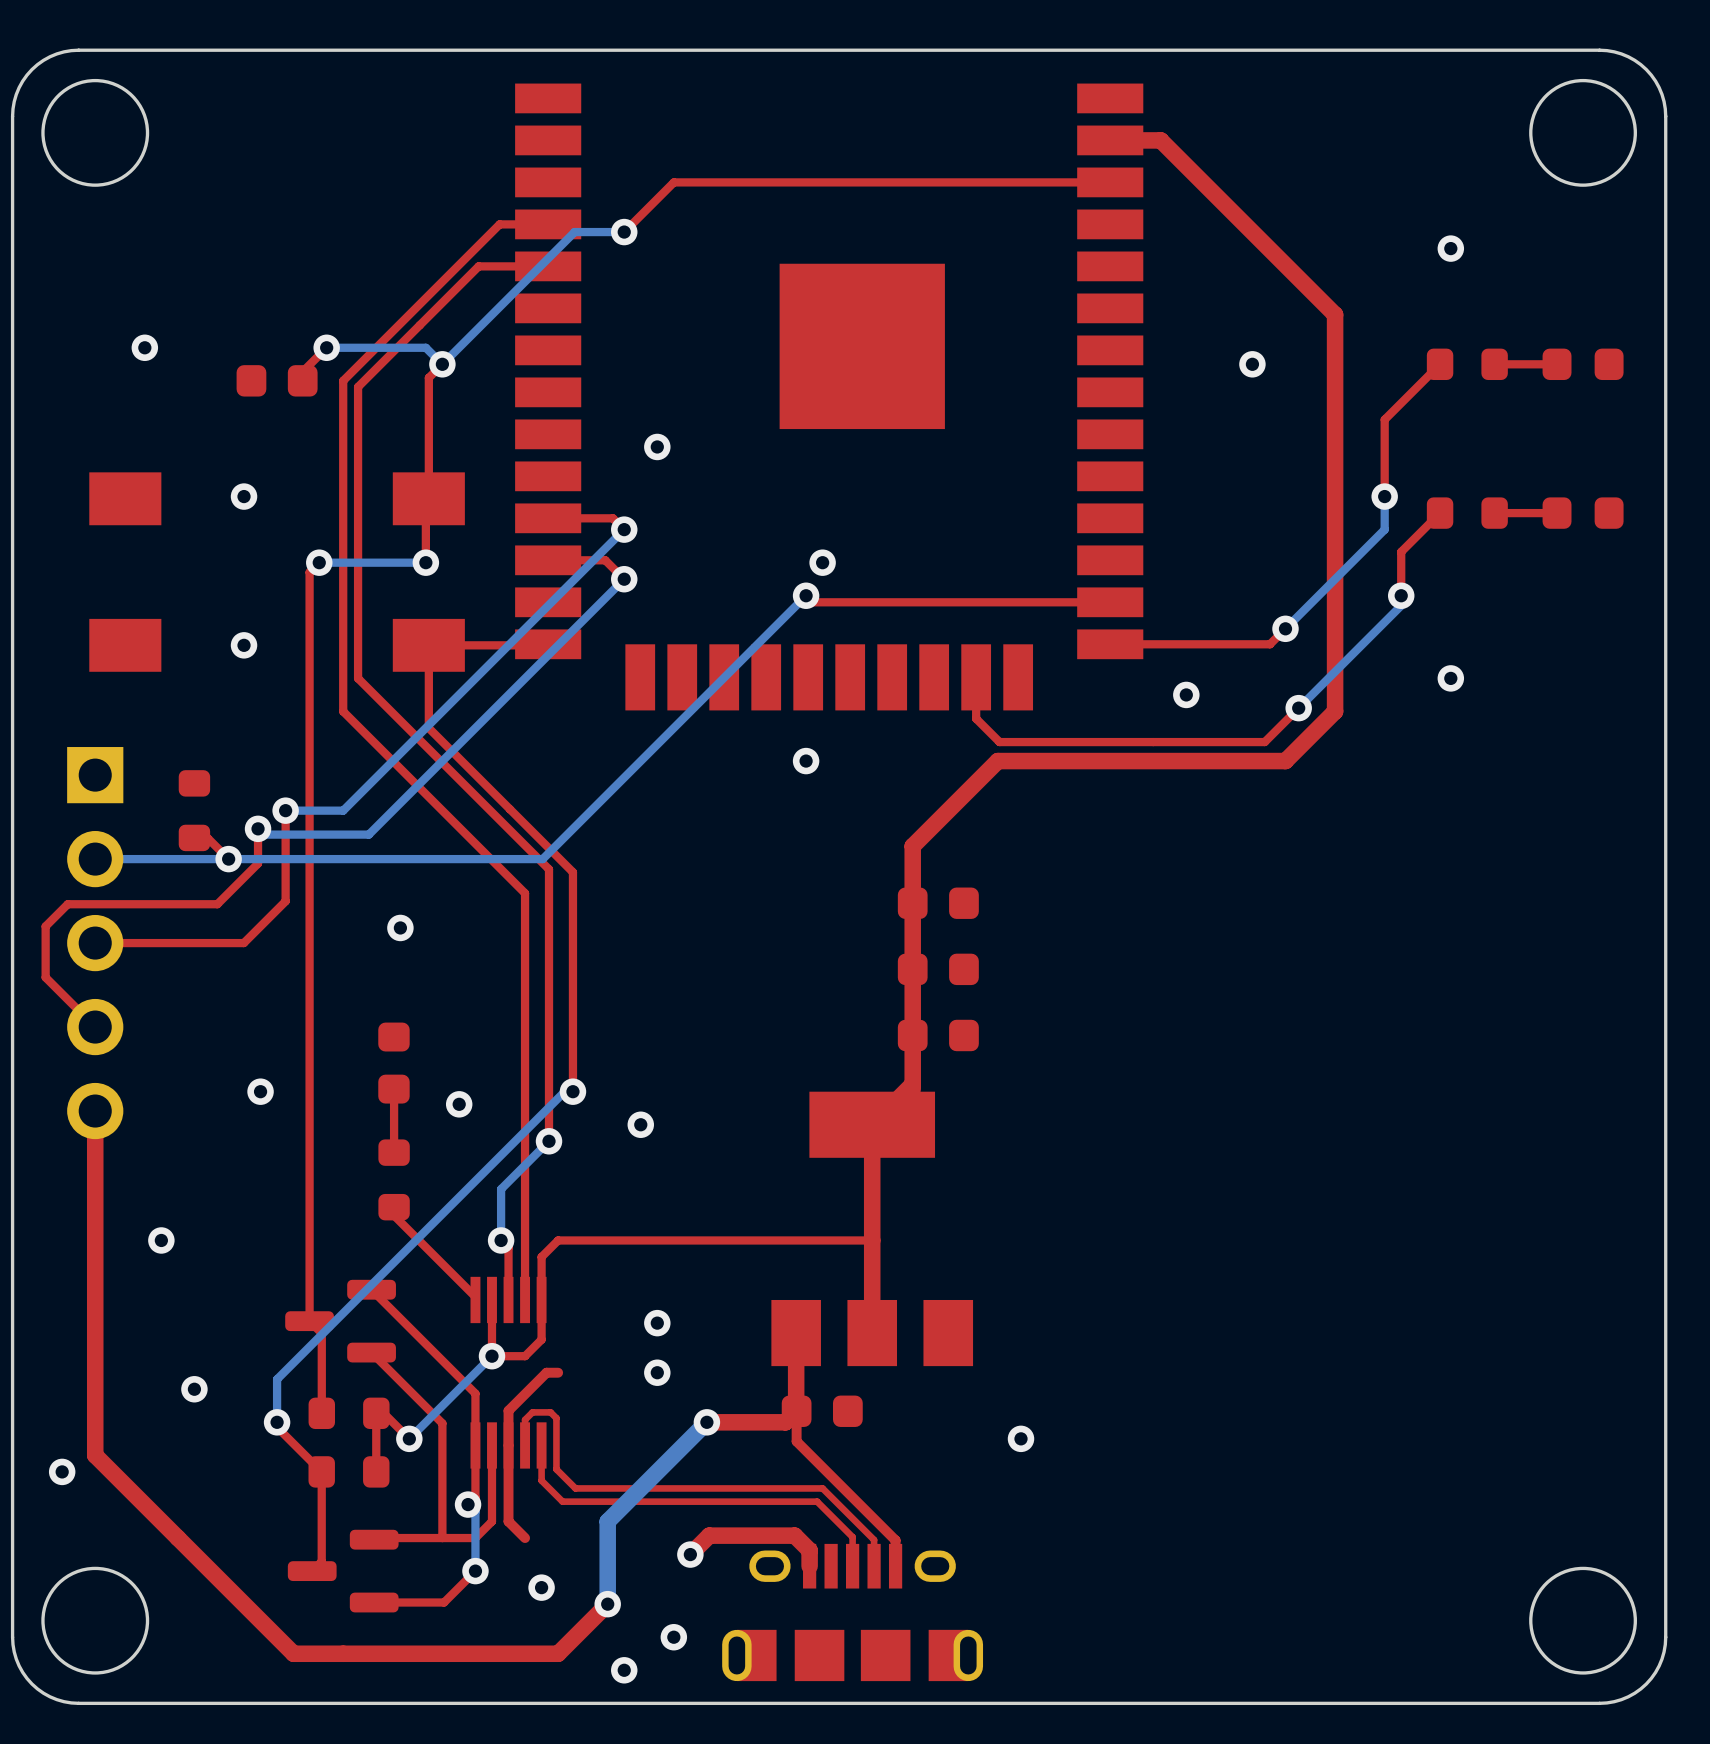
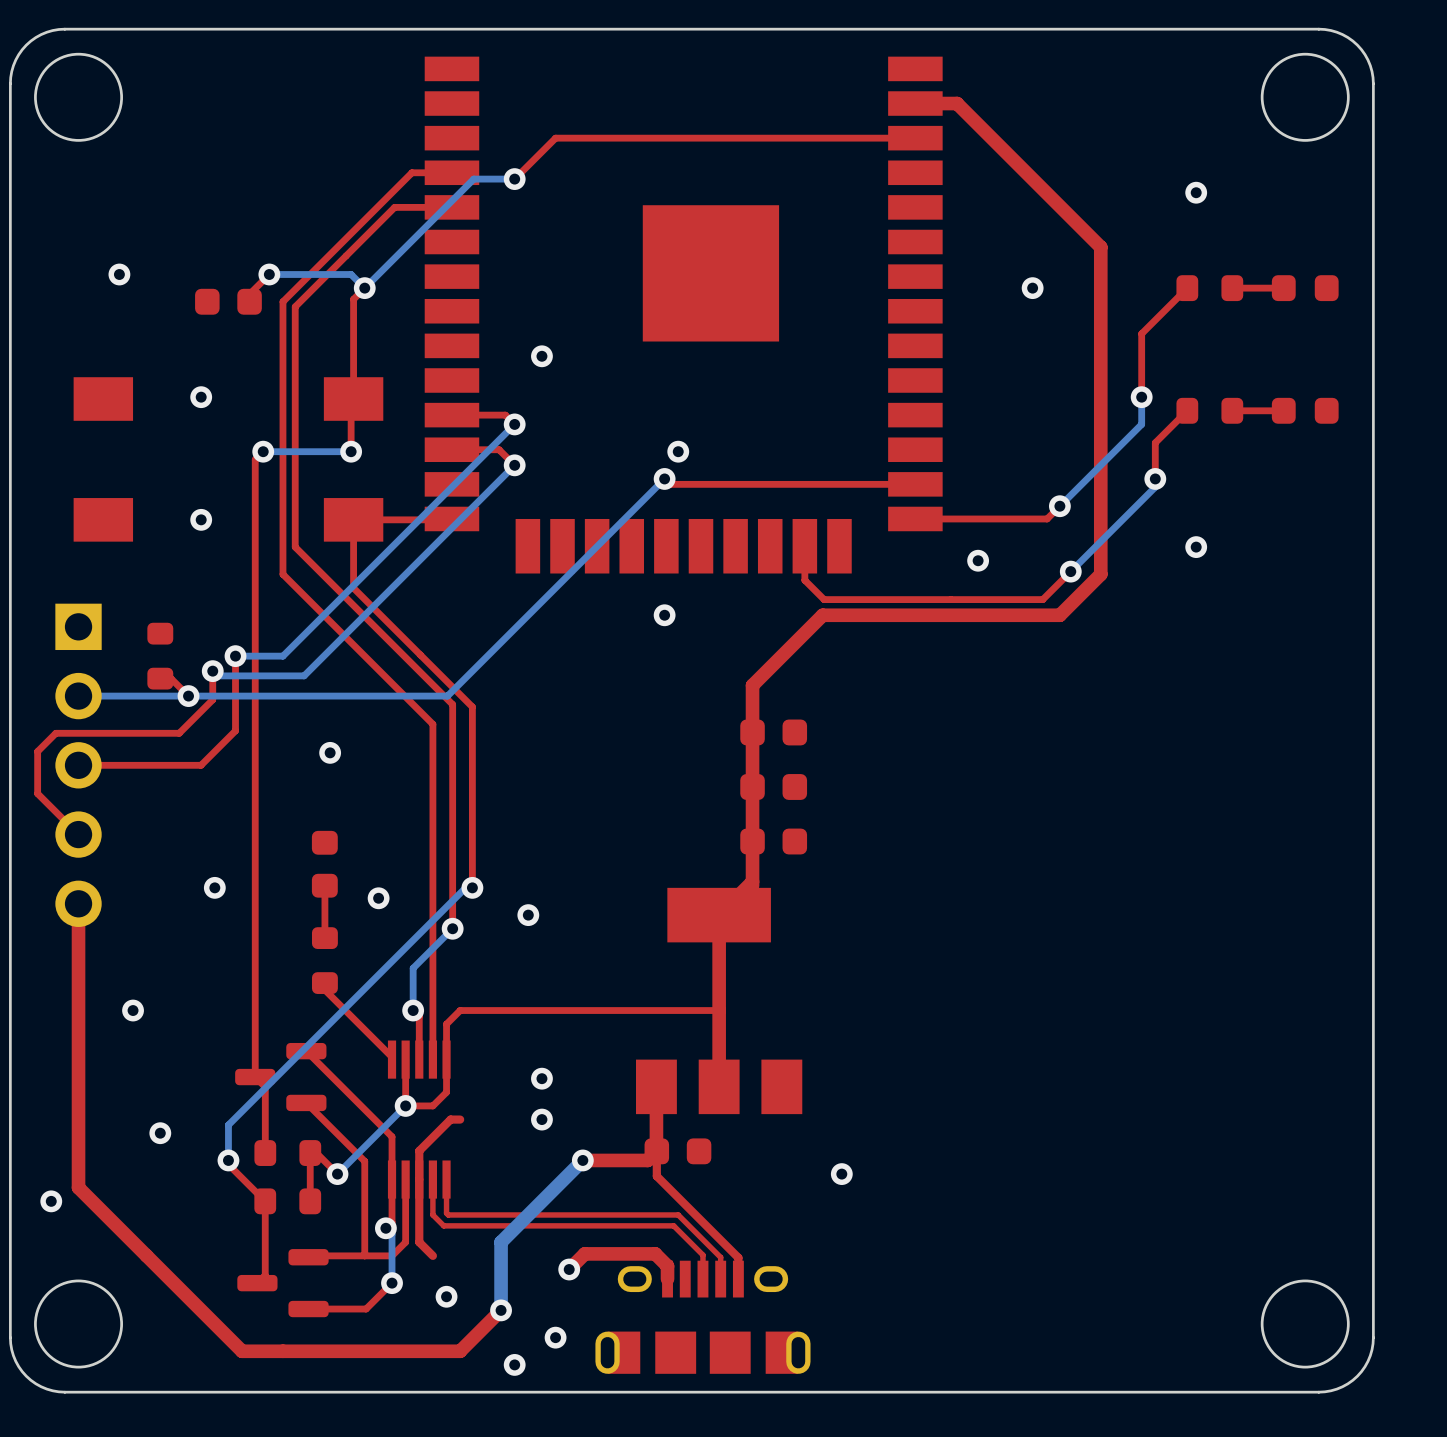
top track: (525, 1445) (525, 1419) (532, 1412) (550, 1412) (556, 1418) (556, 1469) (575, 1488) -> (432, 1179) (432, 1214) (443, 1225) (463, 1225)
top track: (541, 1480) (562, 1501) -> (446, 1208) (448, 1214) (474, 1214)

